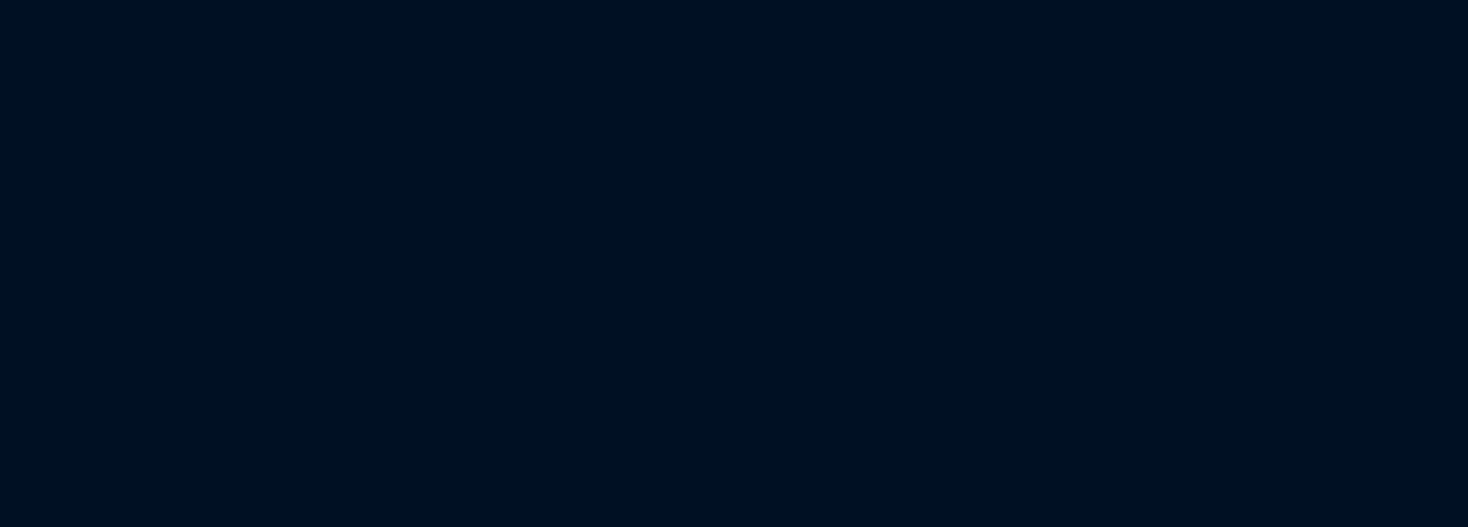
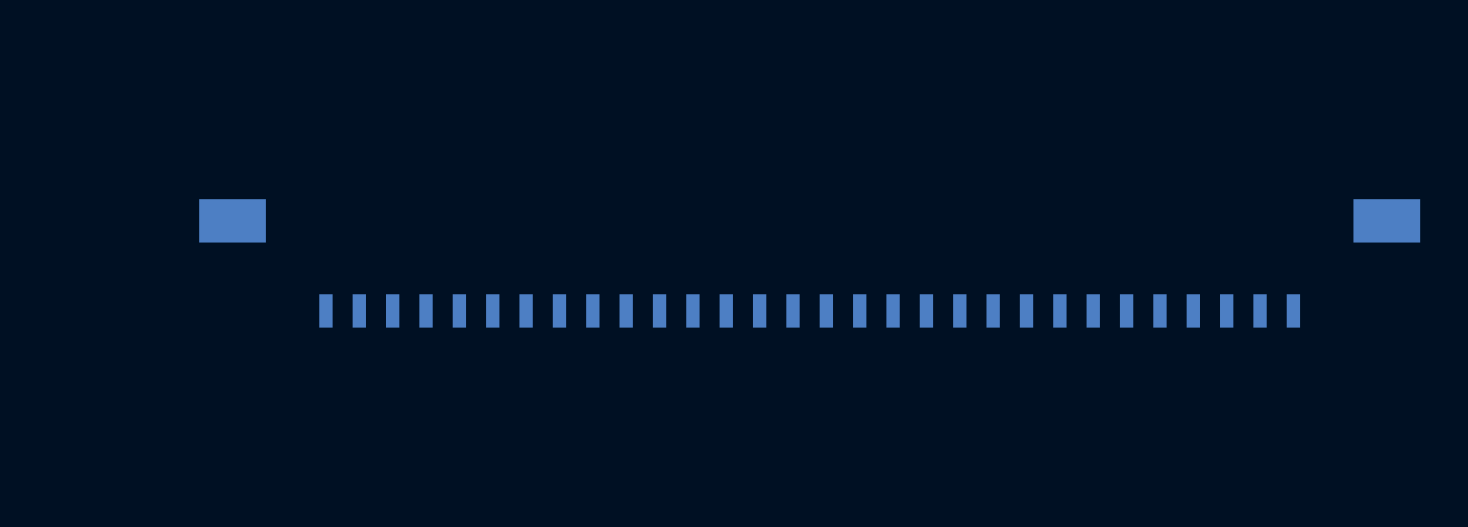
part: none -> (809, 263)

